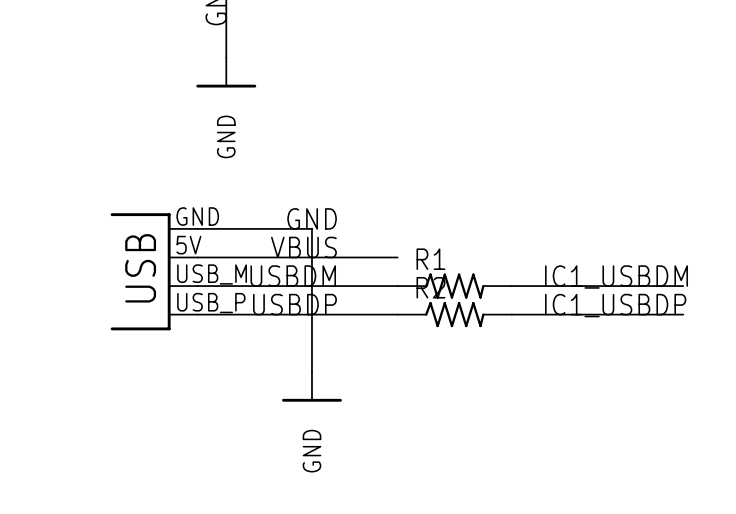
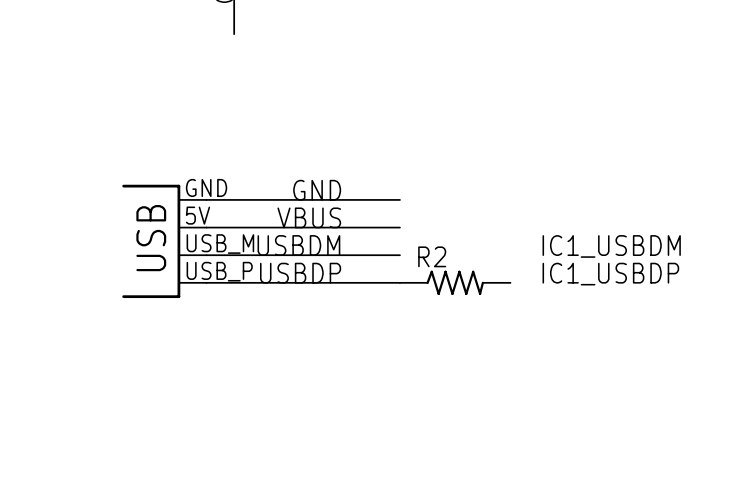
power symbol: (226, 72) -> none
wire: (311, 228) (311, 371) -> (317, 199) (399, 199)
R1: (454, 286) -> none
wire: (511, 286) (683, 286) -> none
wire: (511, 314) (683, 314) -> none
power symbol: (311, 386) -> none

